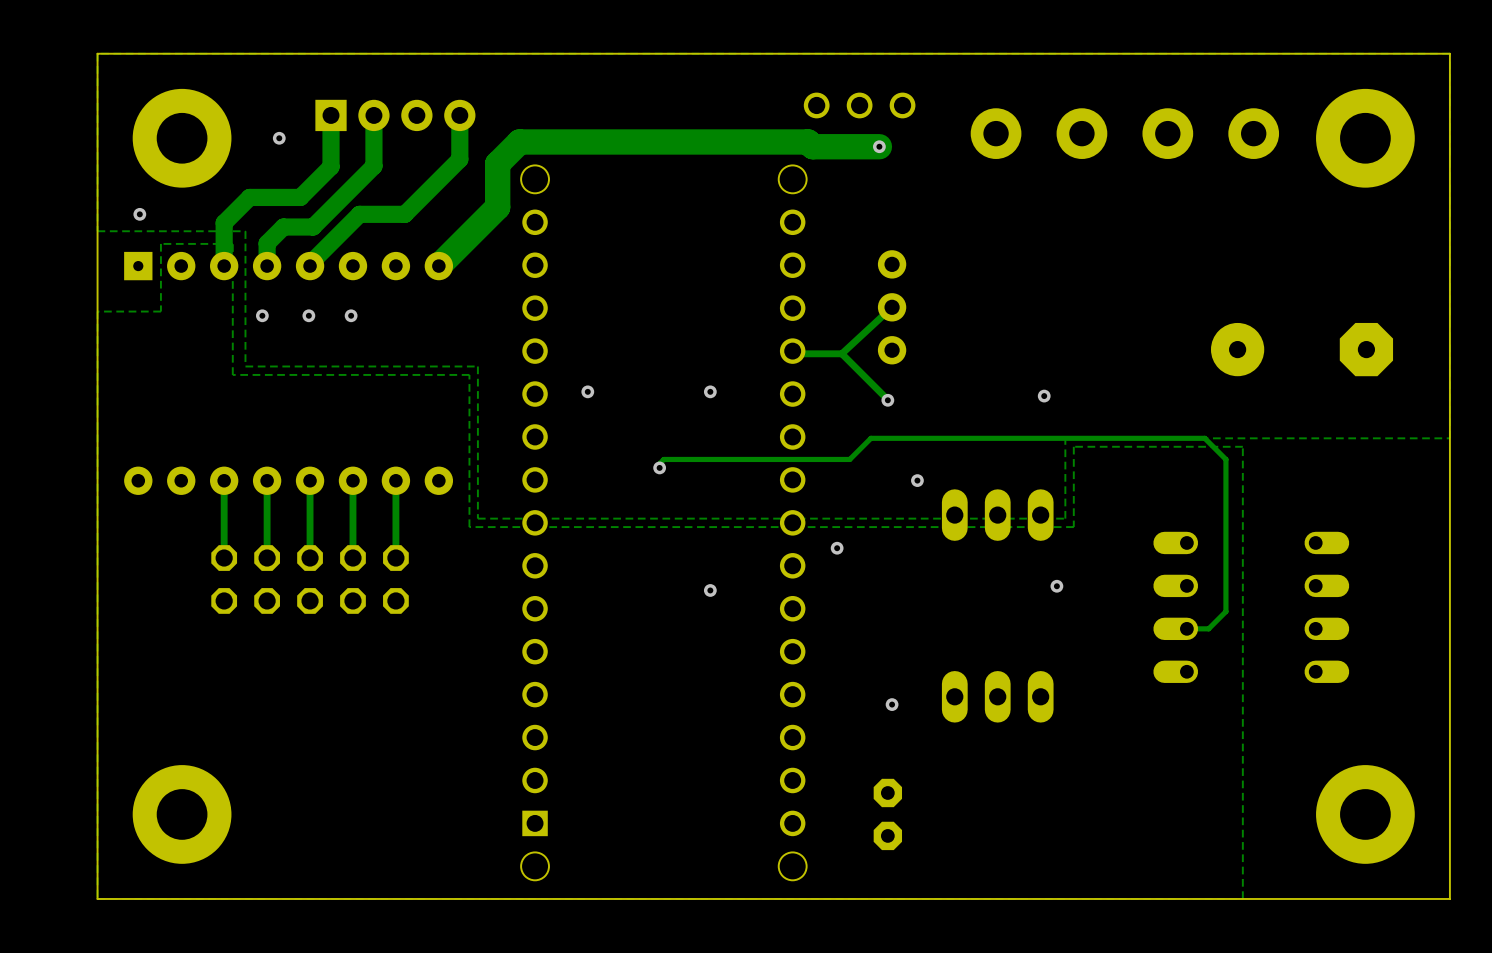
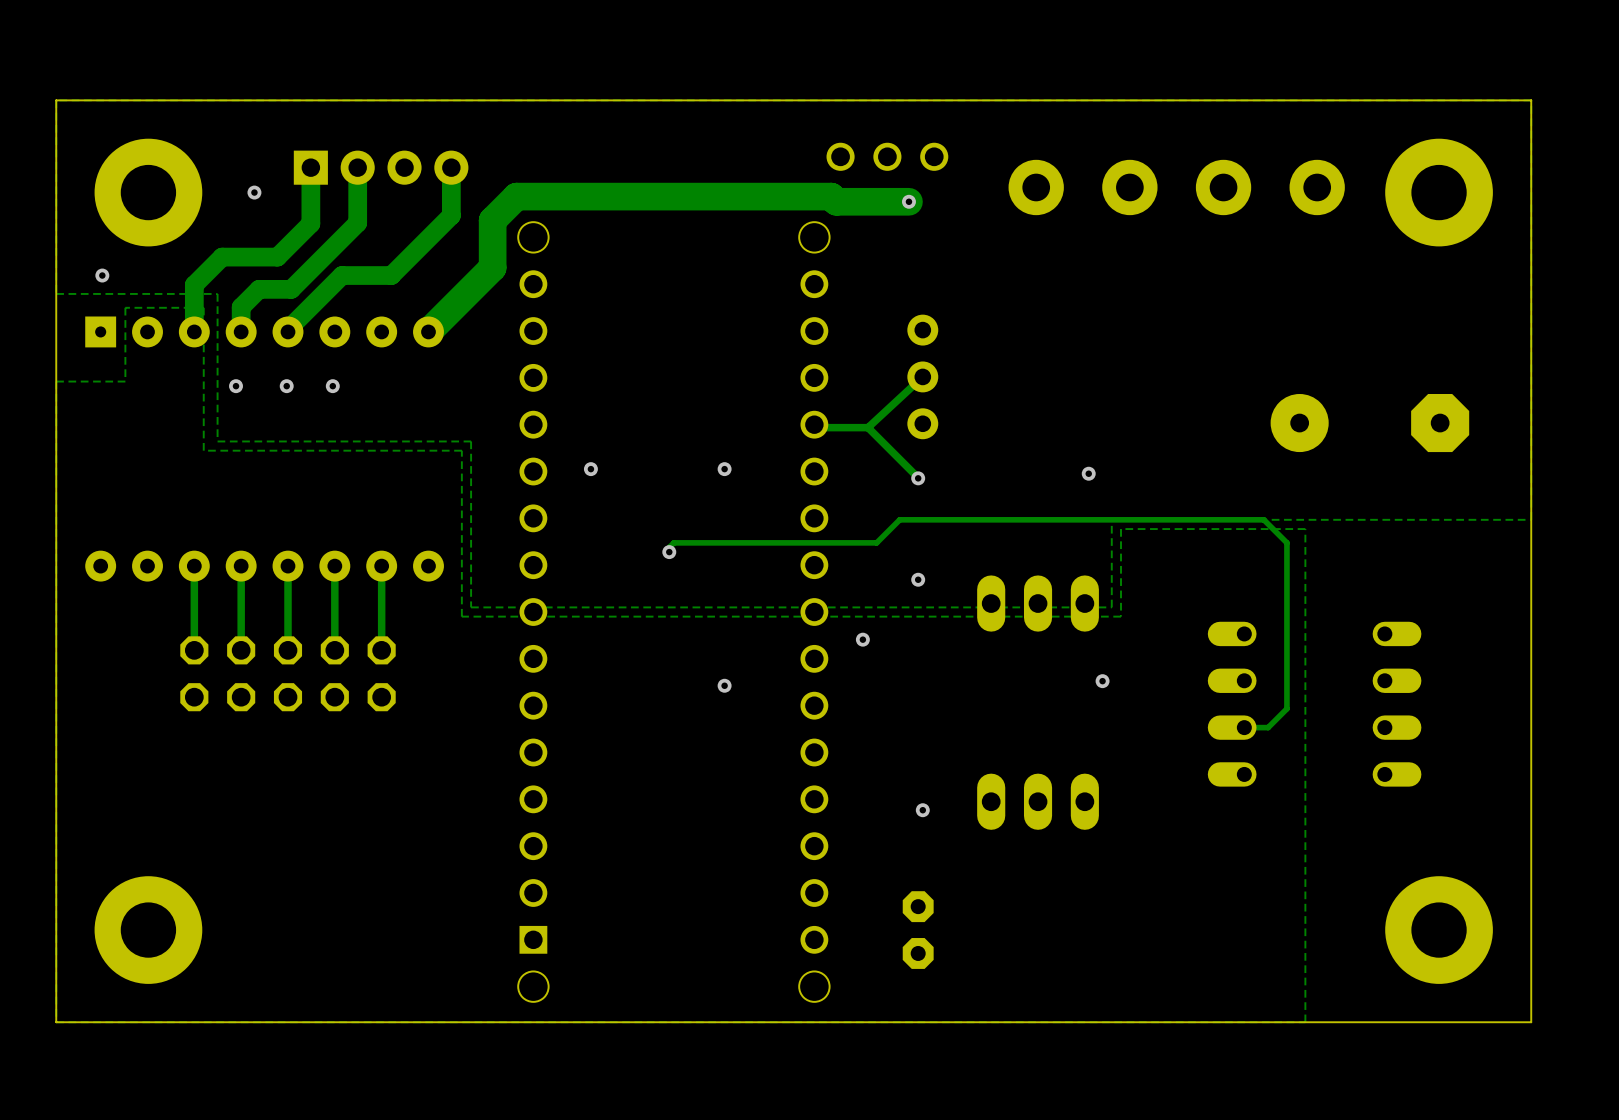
via position: (917, 480) -> (918, 579)

